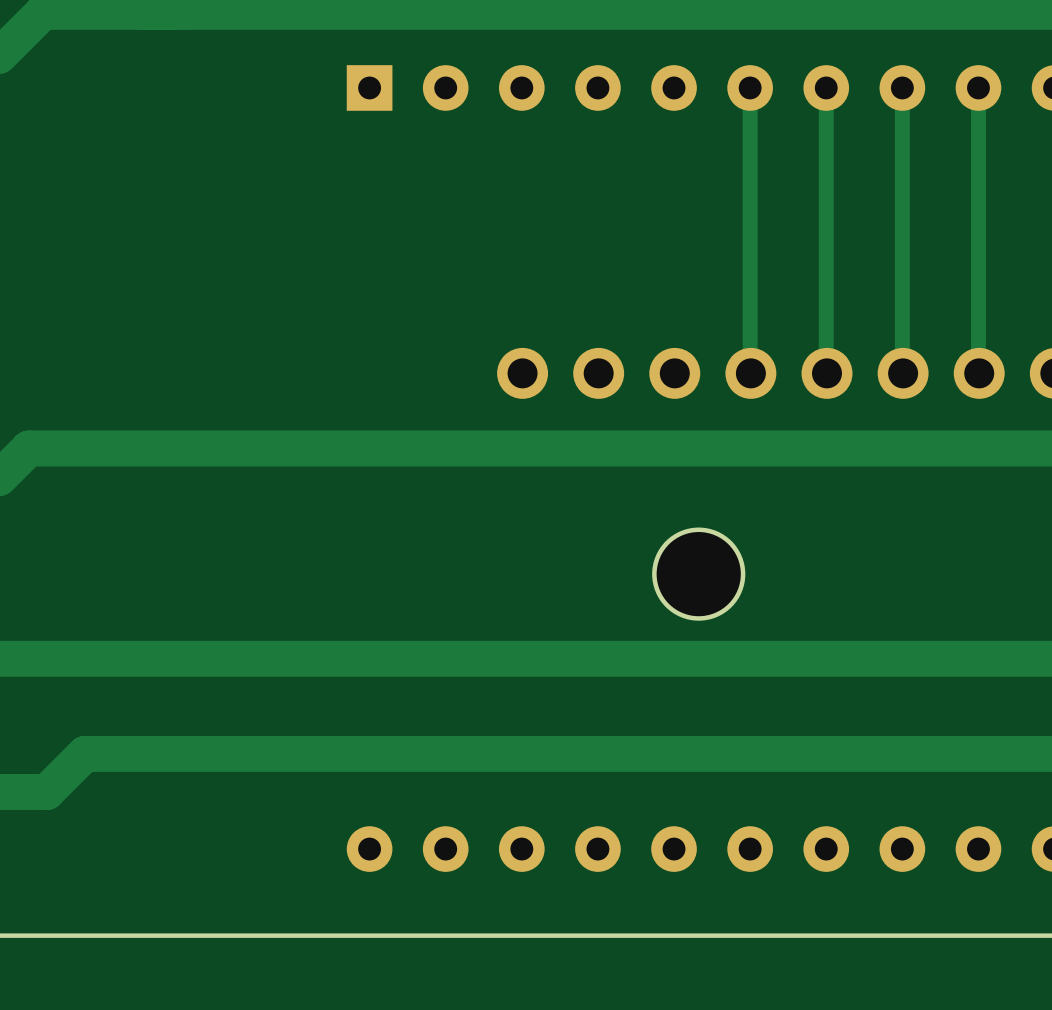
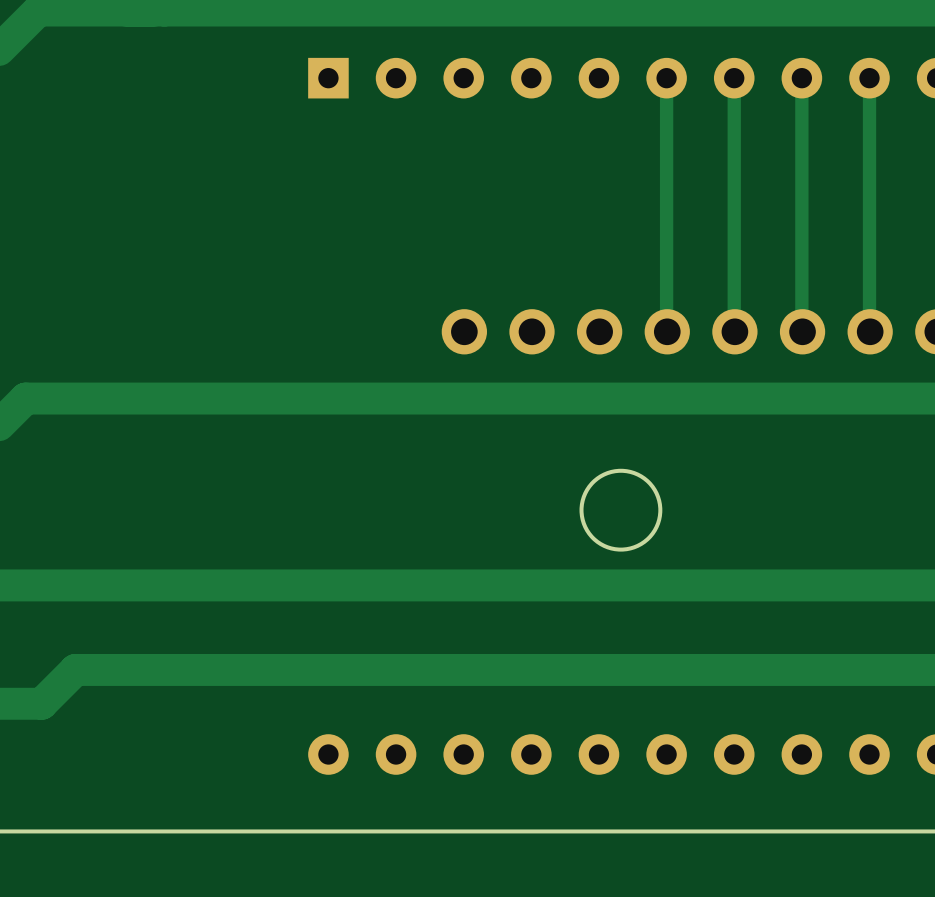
part: (698, 574) -> none

